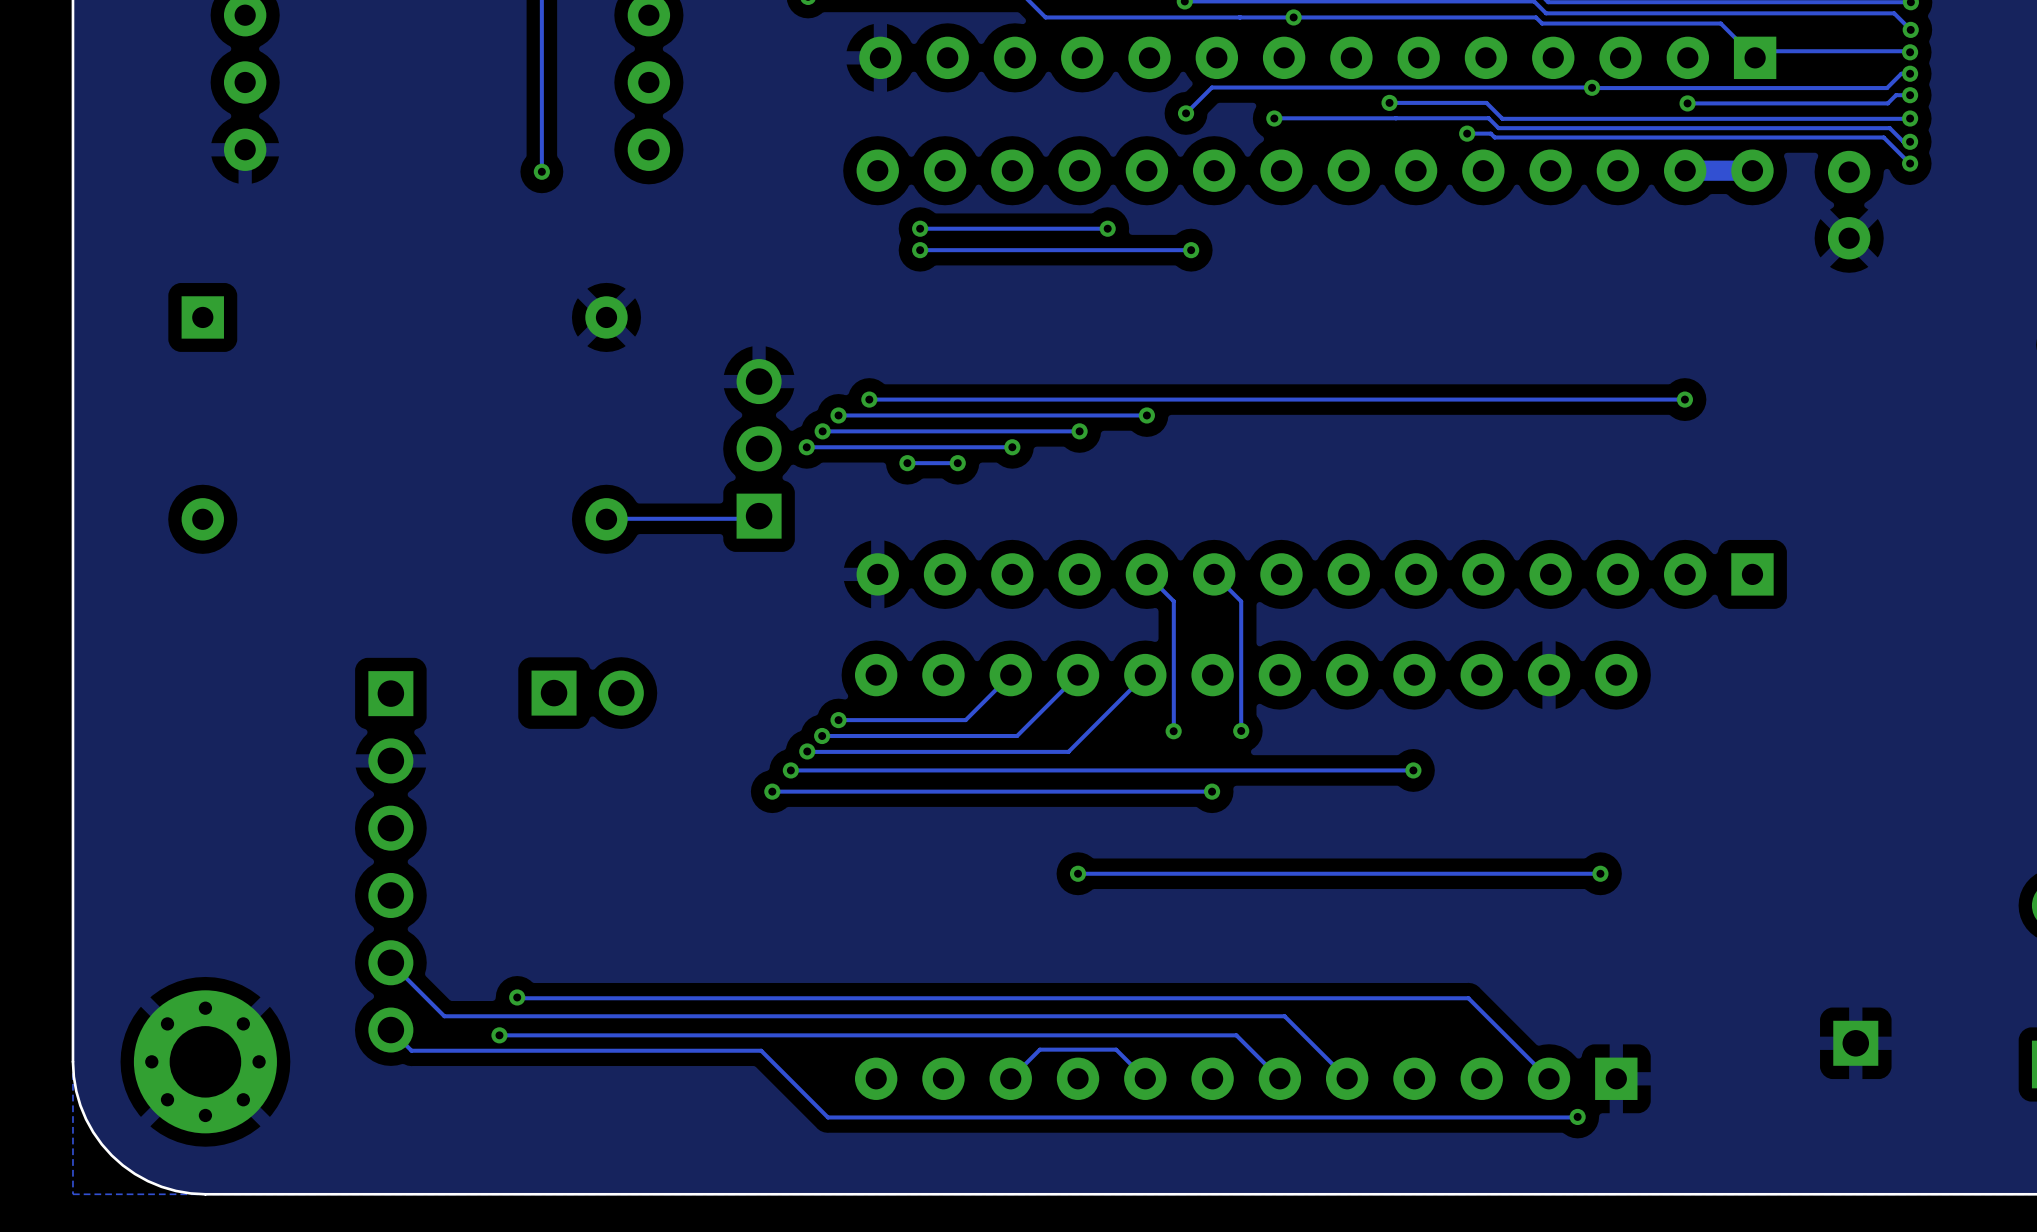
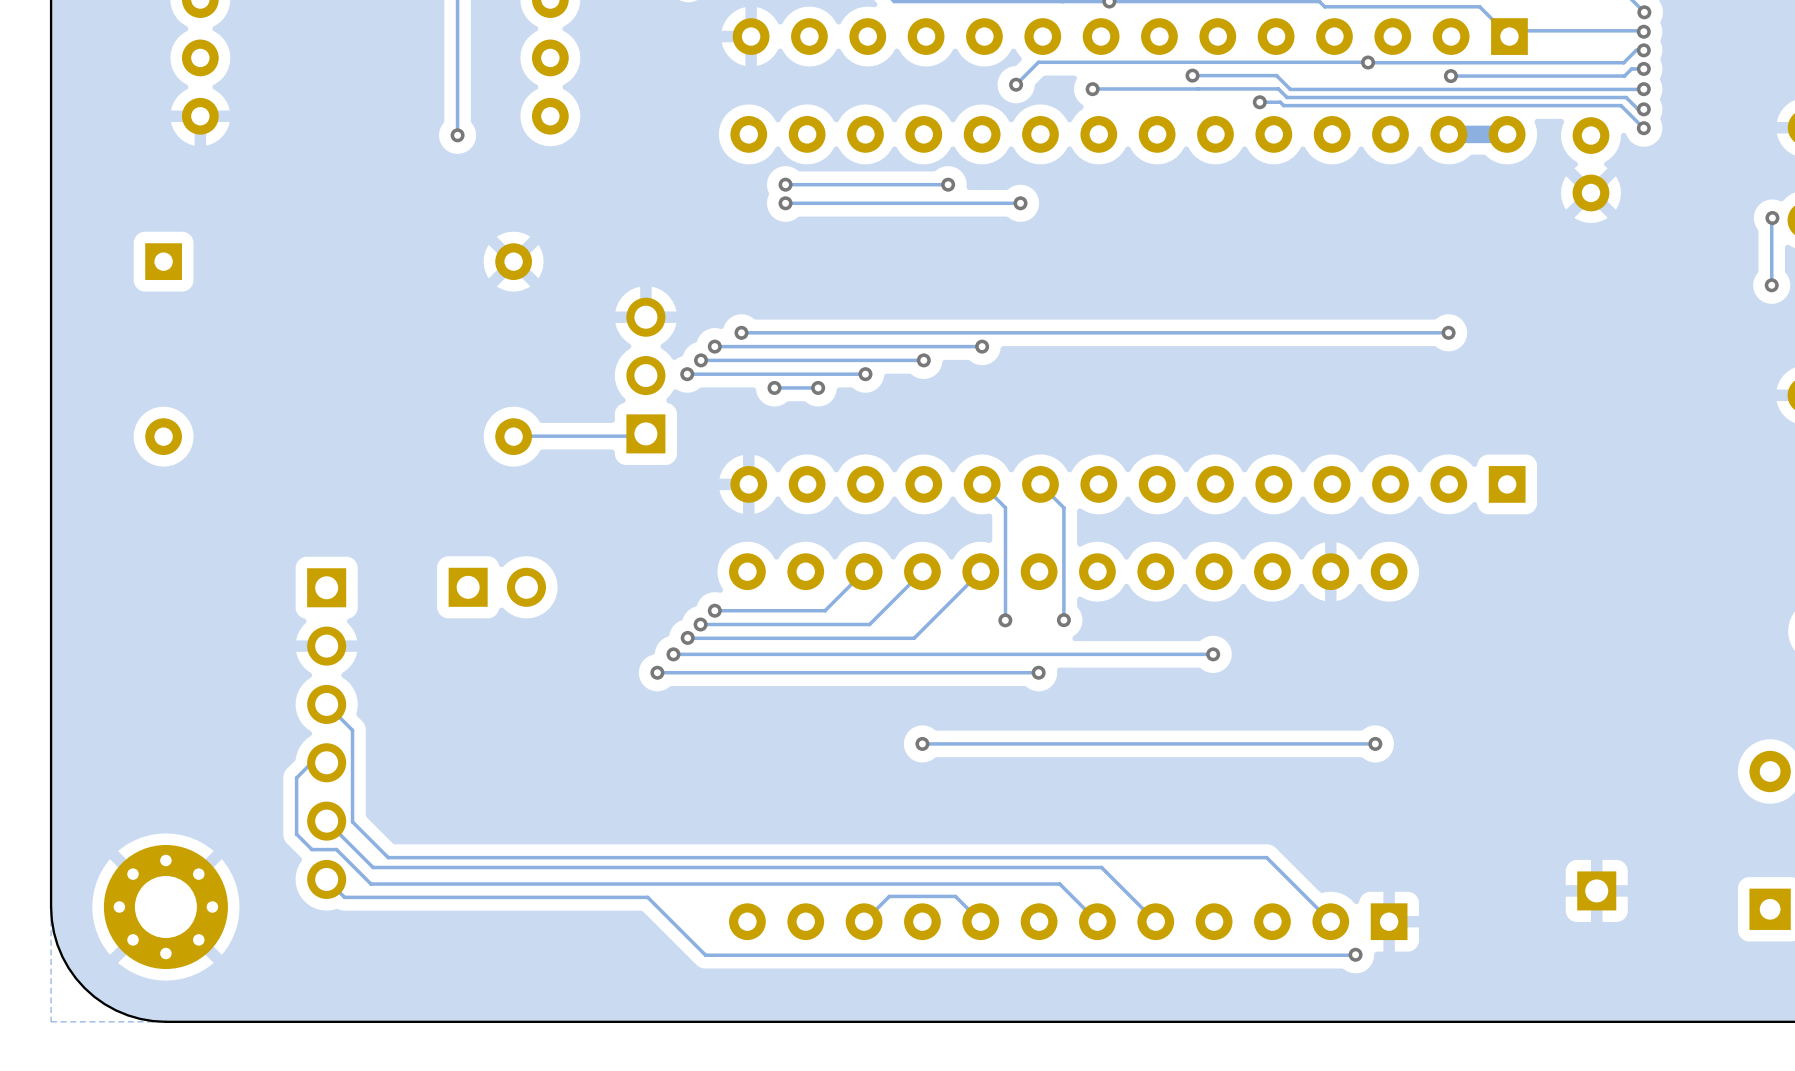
track: none -> (326, 762) (311, 762) (296, 777) (296, 834) (311, 849) (336, 849) (370, 884) (420, 884)
track: (517, 997) (1468, 998) (1475, 1004) -> (326, 704) (352, 730) (352, 821) (388, 857) (1266, 857)
via: (517, 997) -> none
via: (499, 1035) -> none

